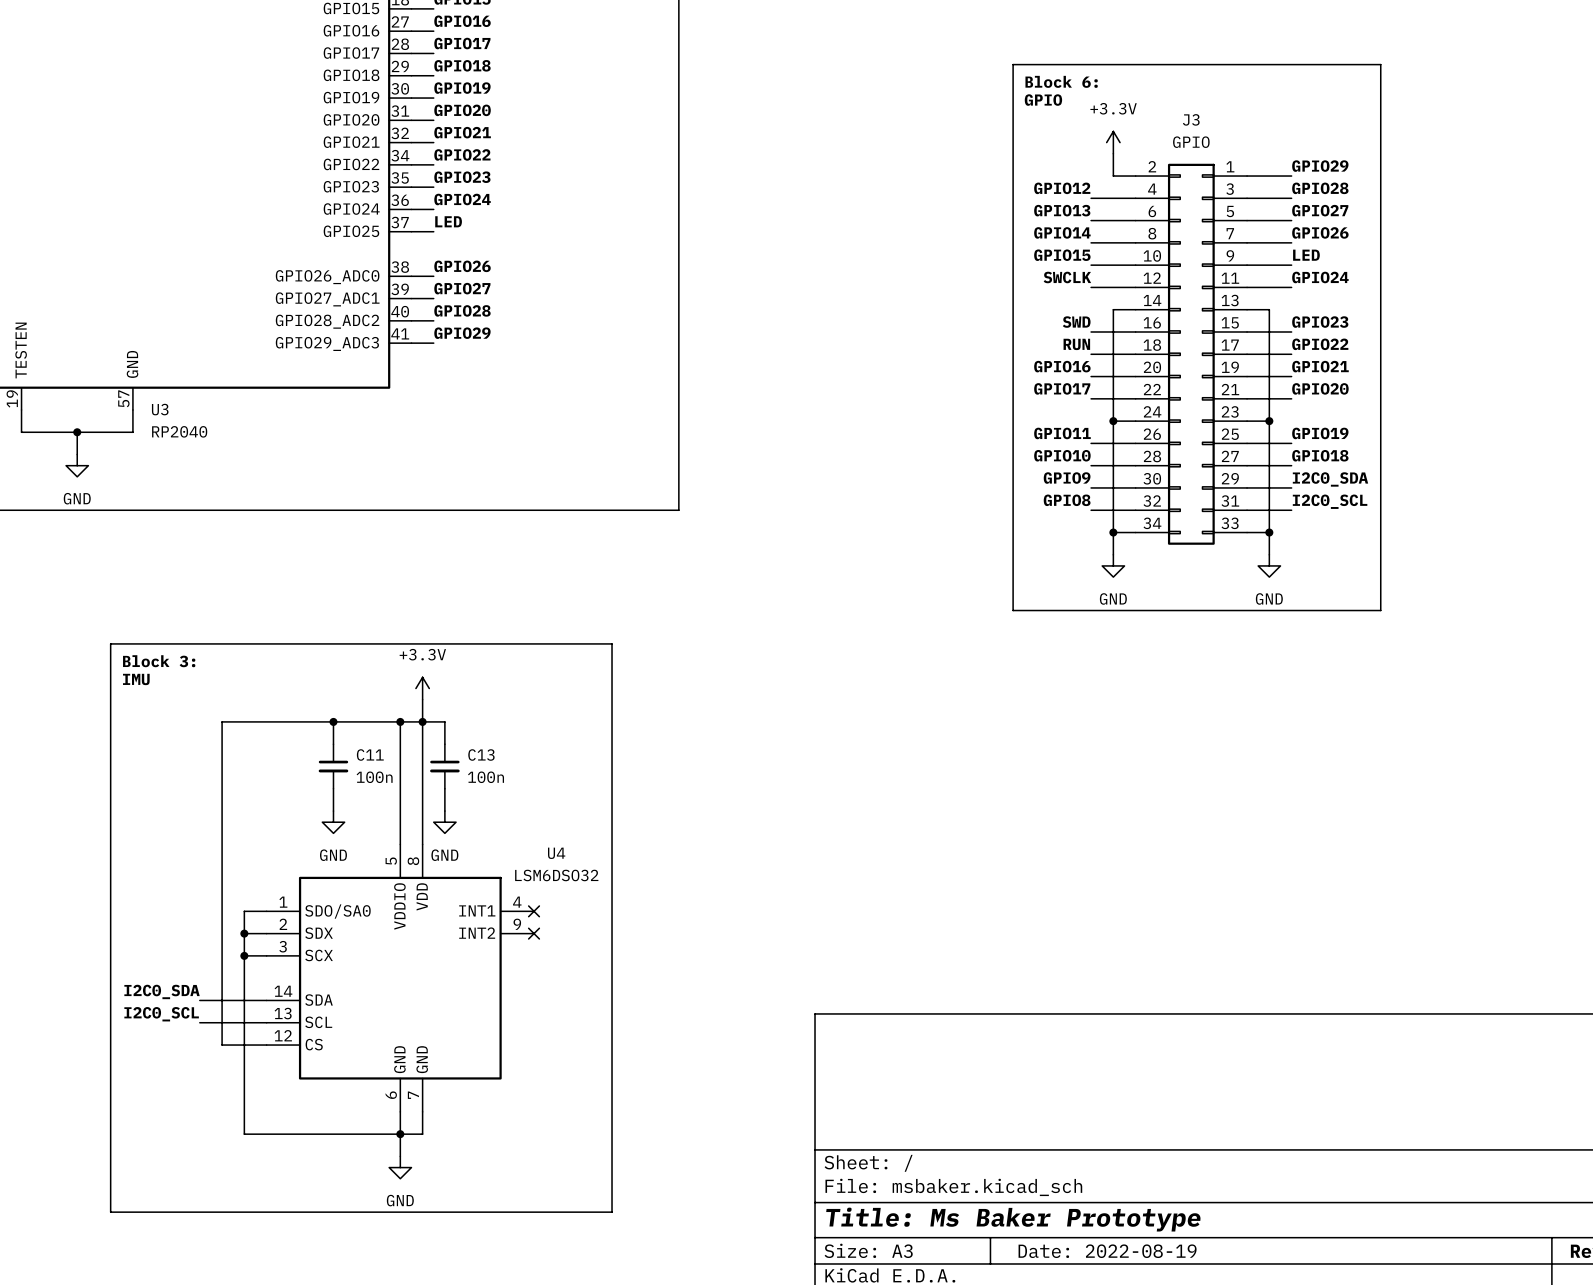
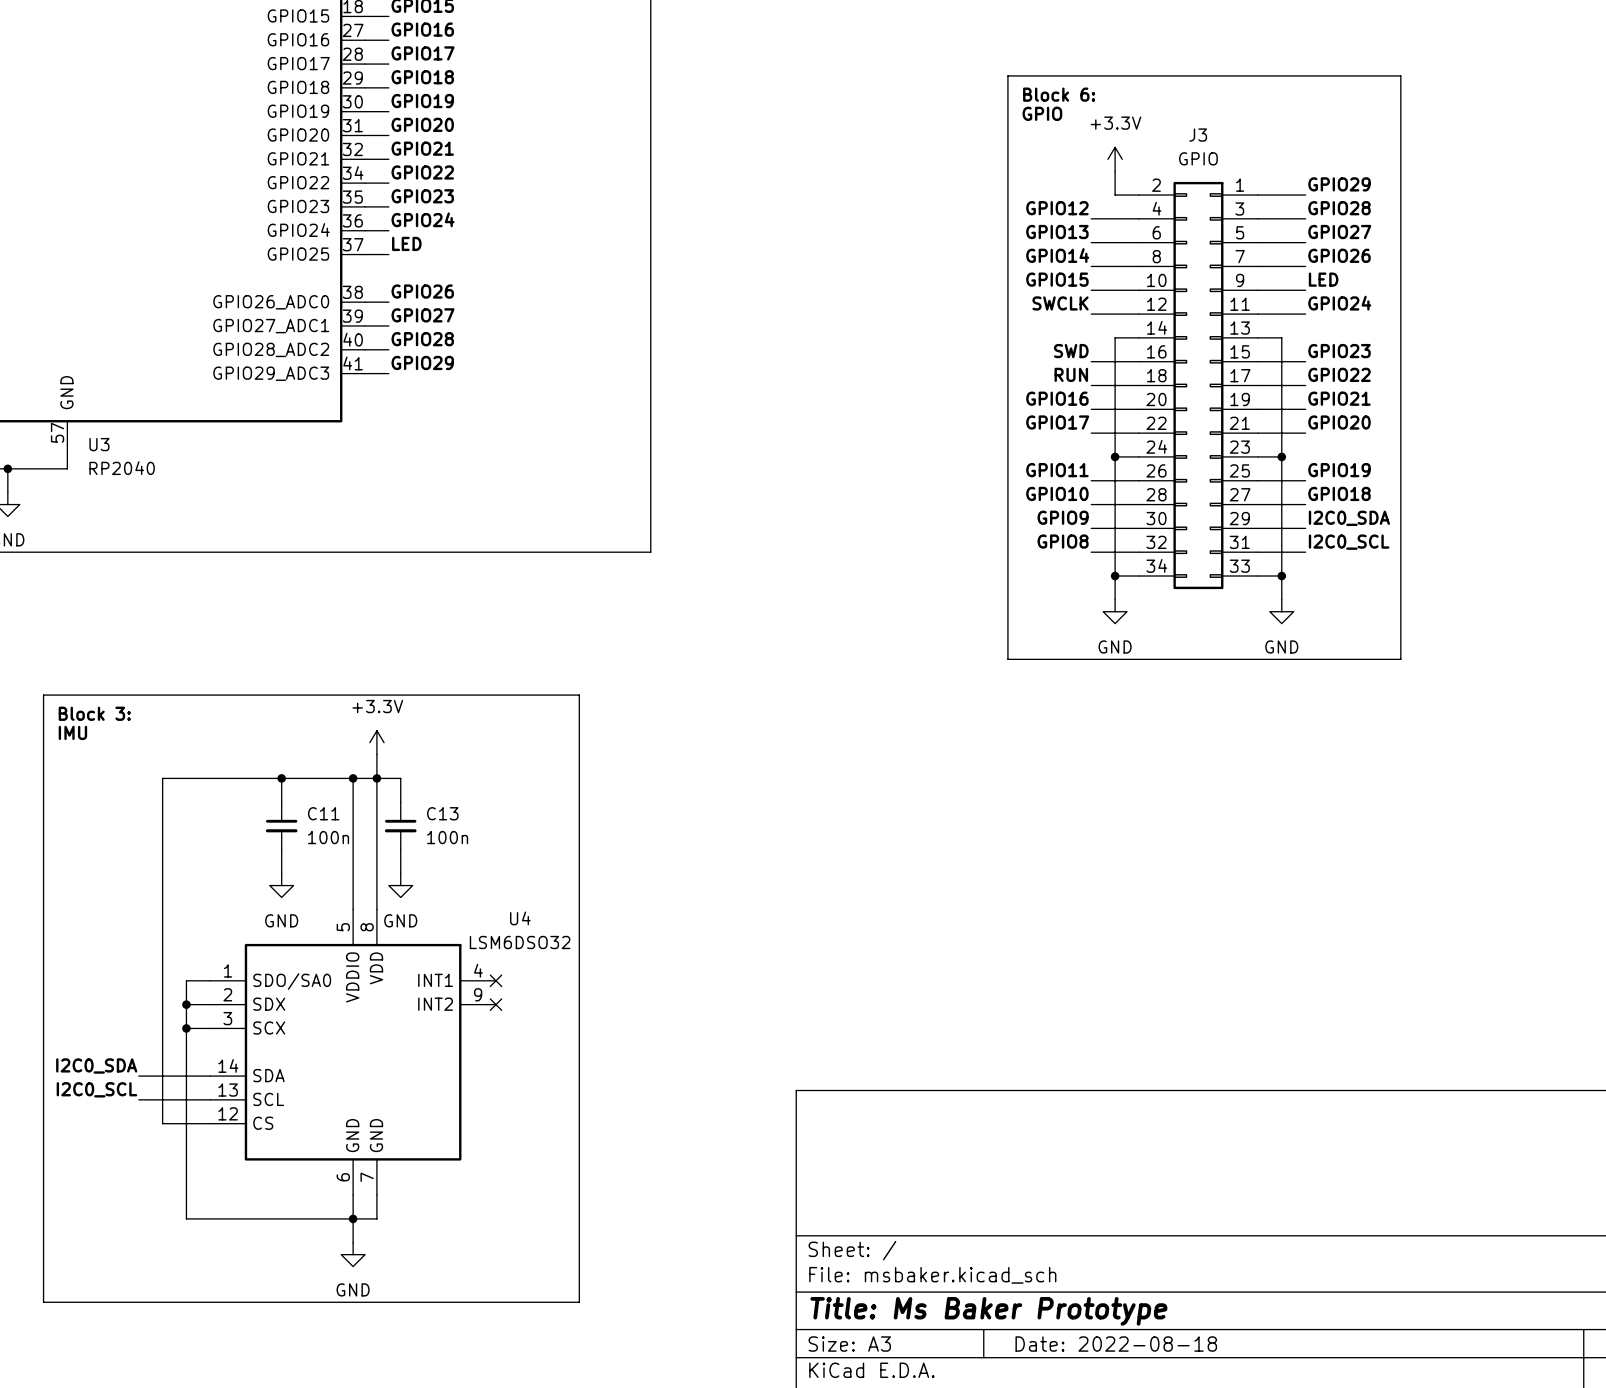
title block: Date: 2022-08-19 (1107, 1251) -> Date: 2022-08-18 (1116, 1344)

